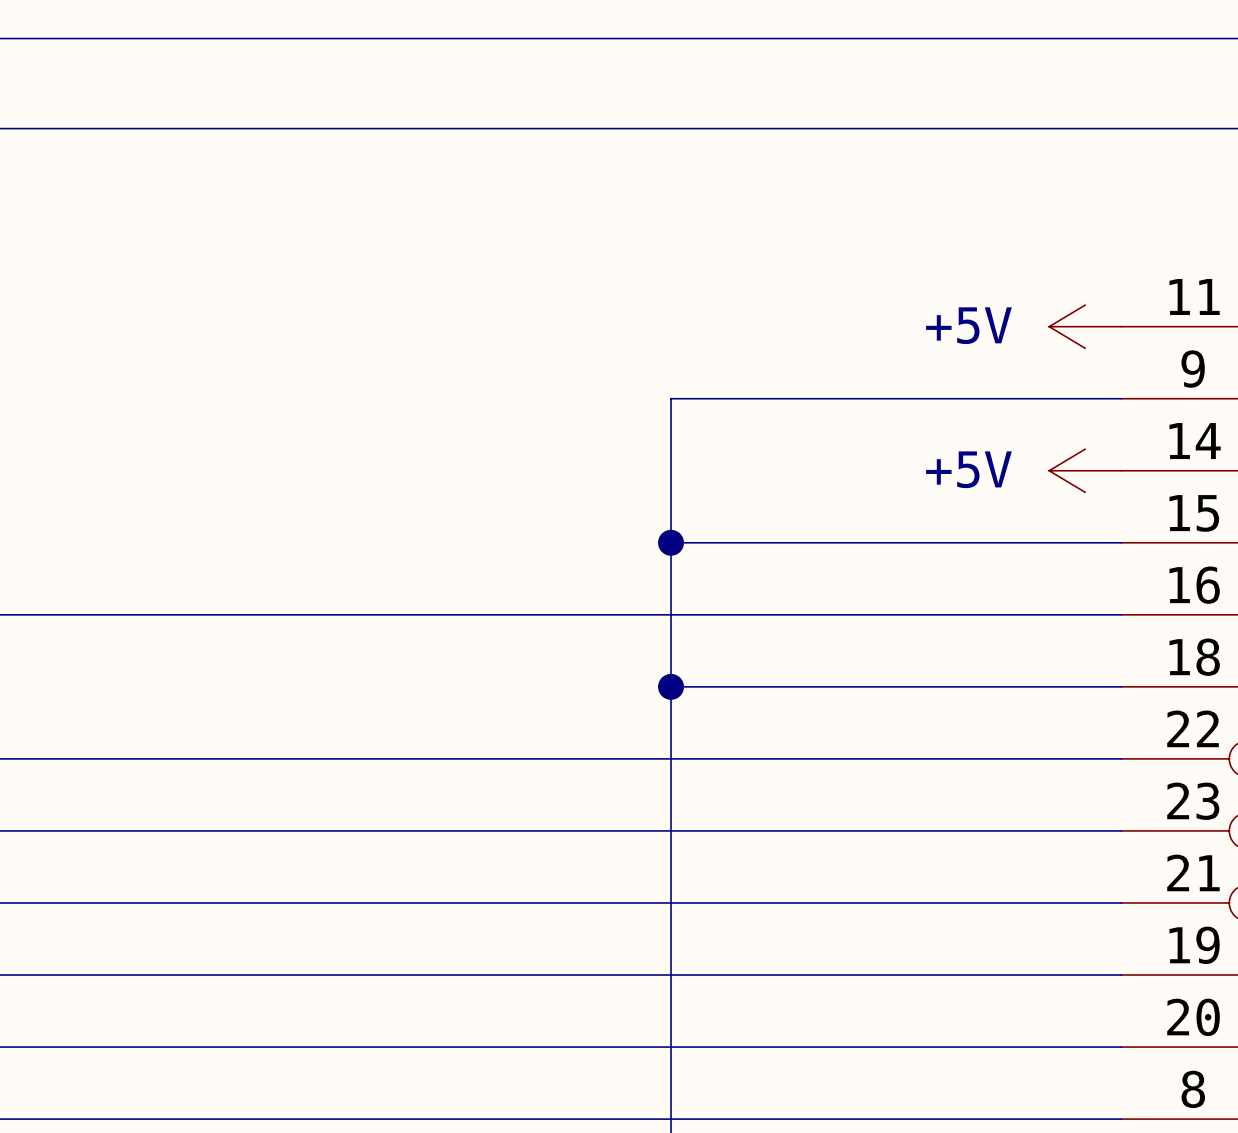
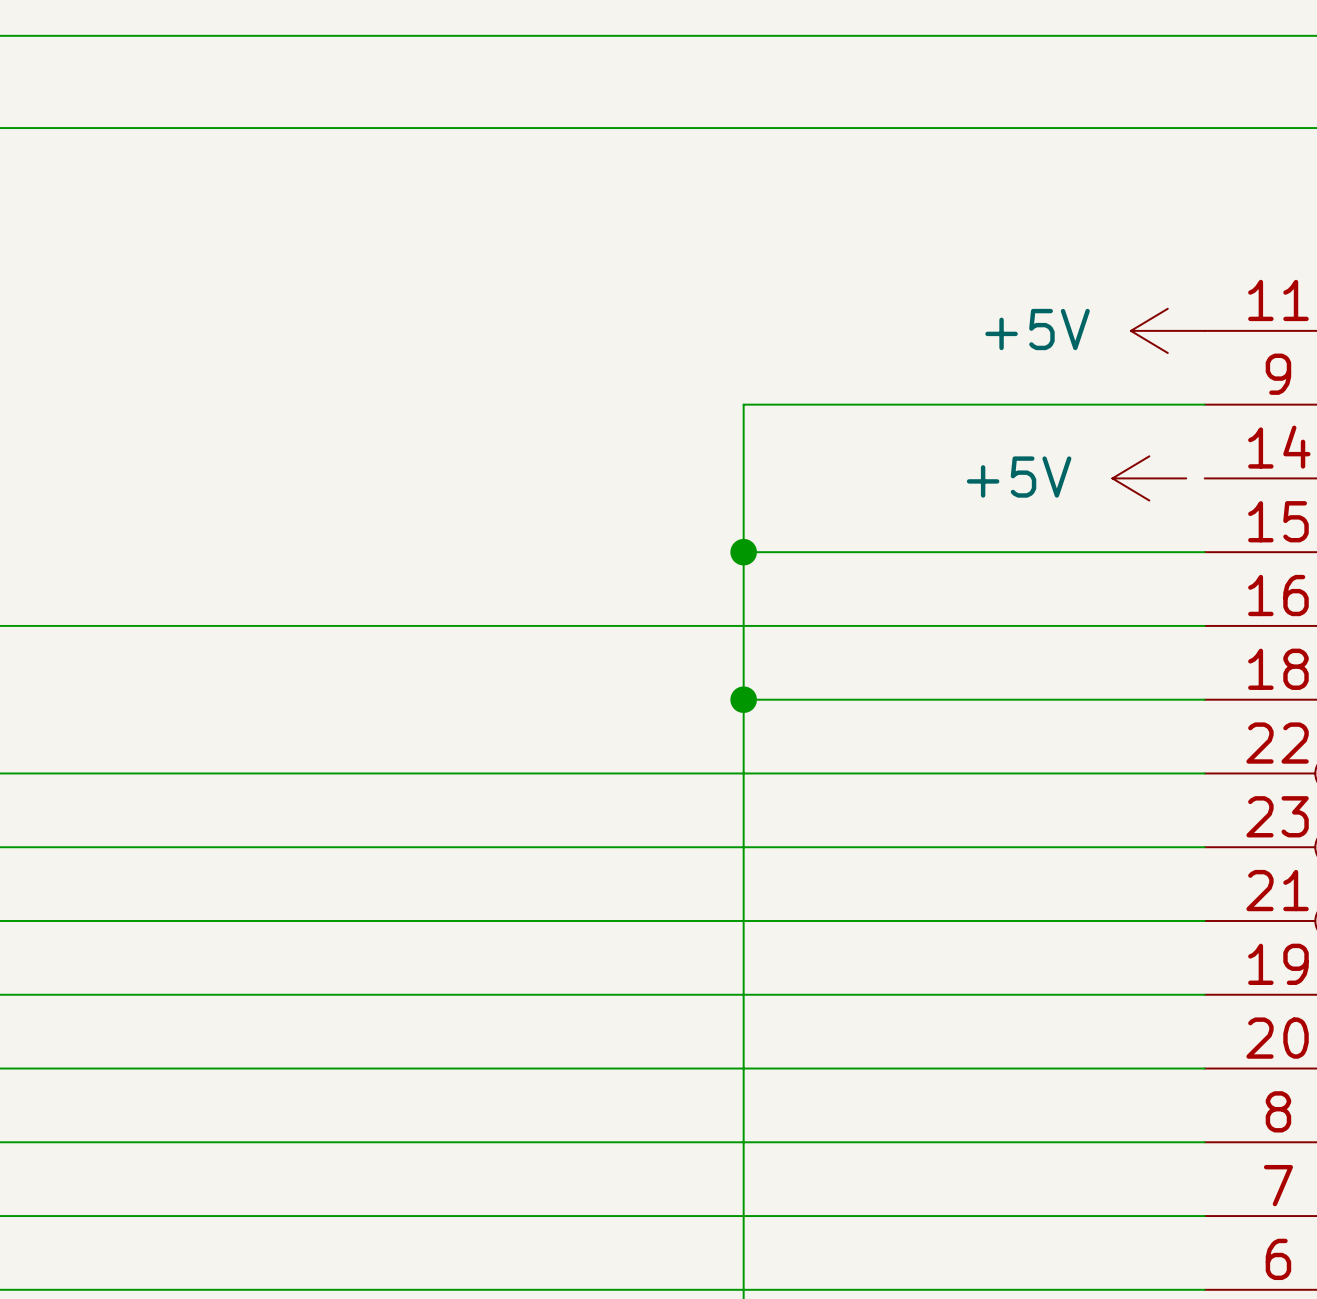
power symbol position: +5V (1085, 470) -> +5V (1149, 478)

